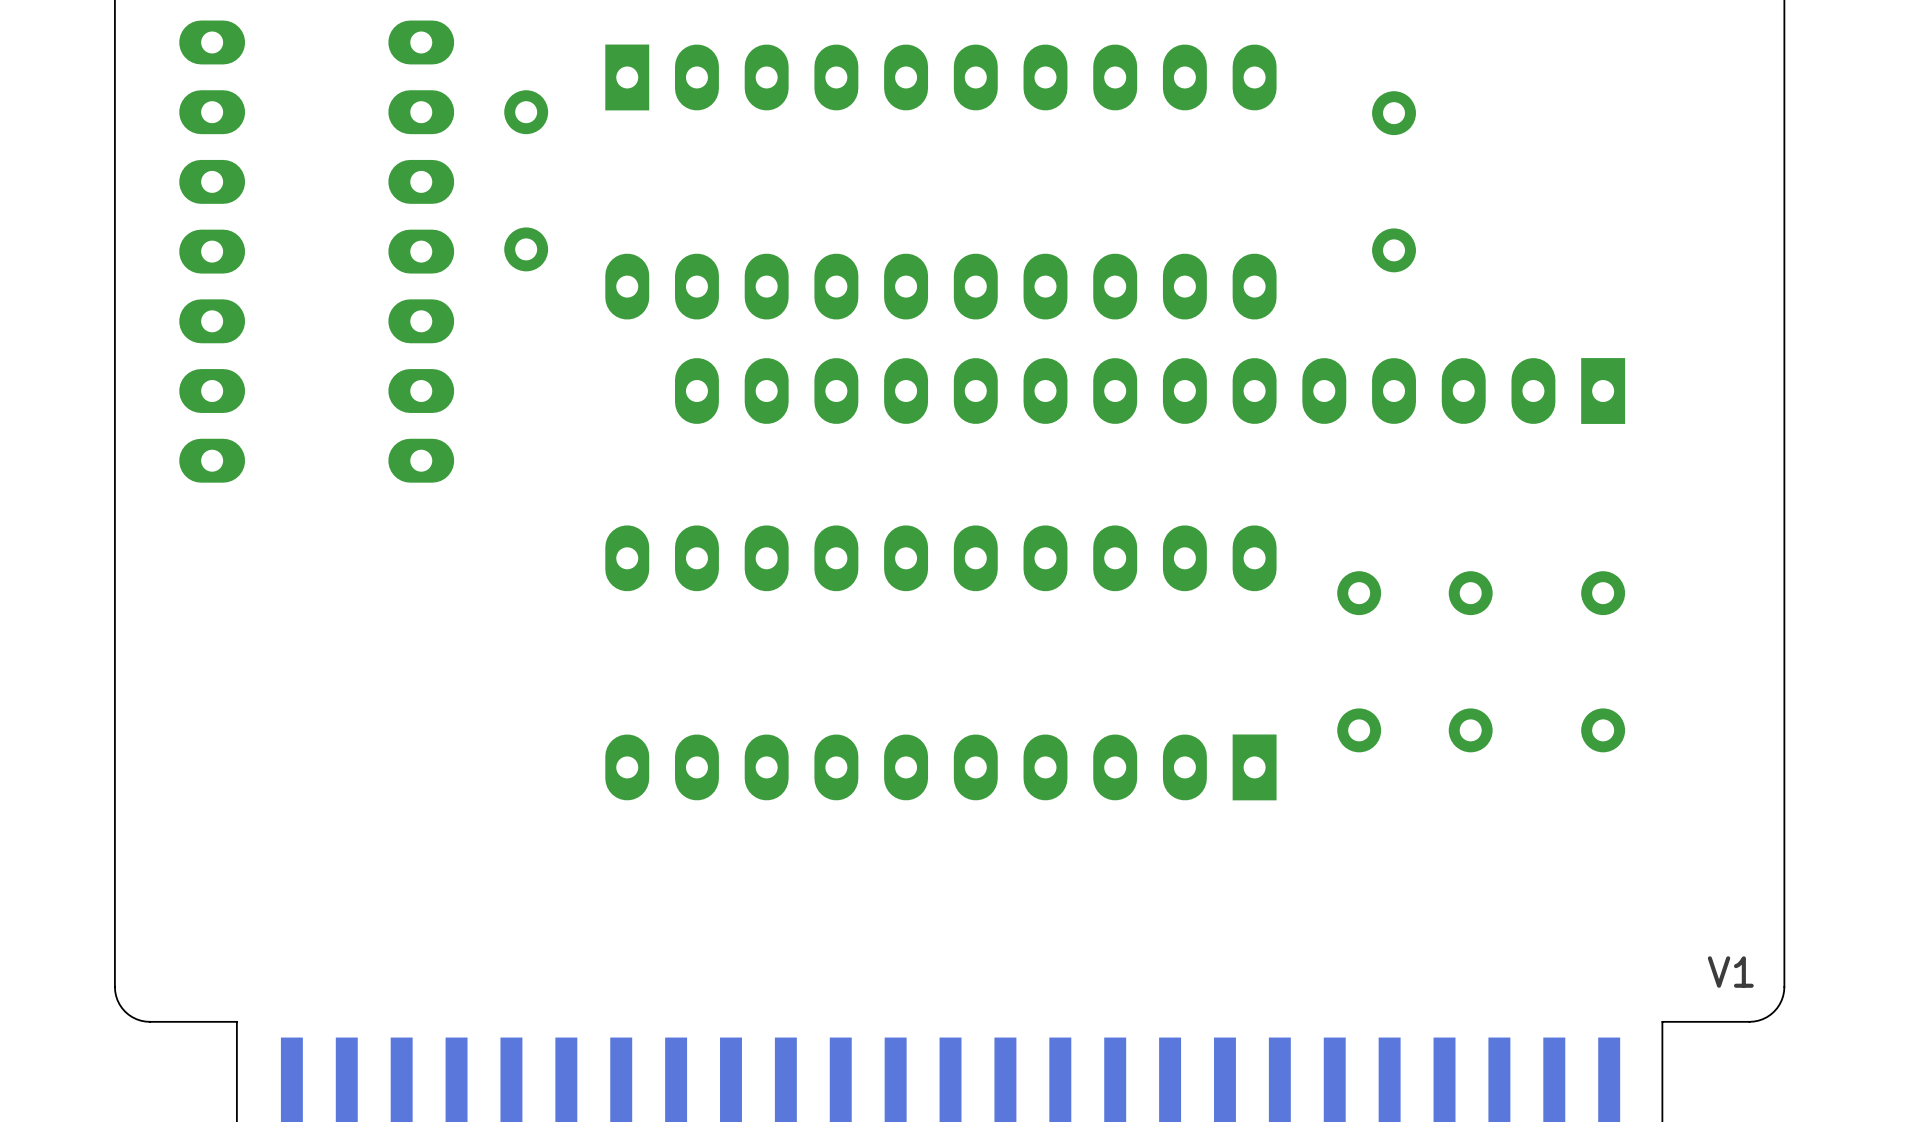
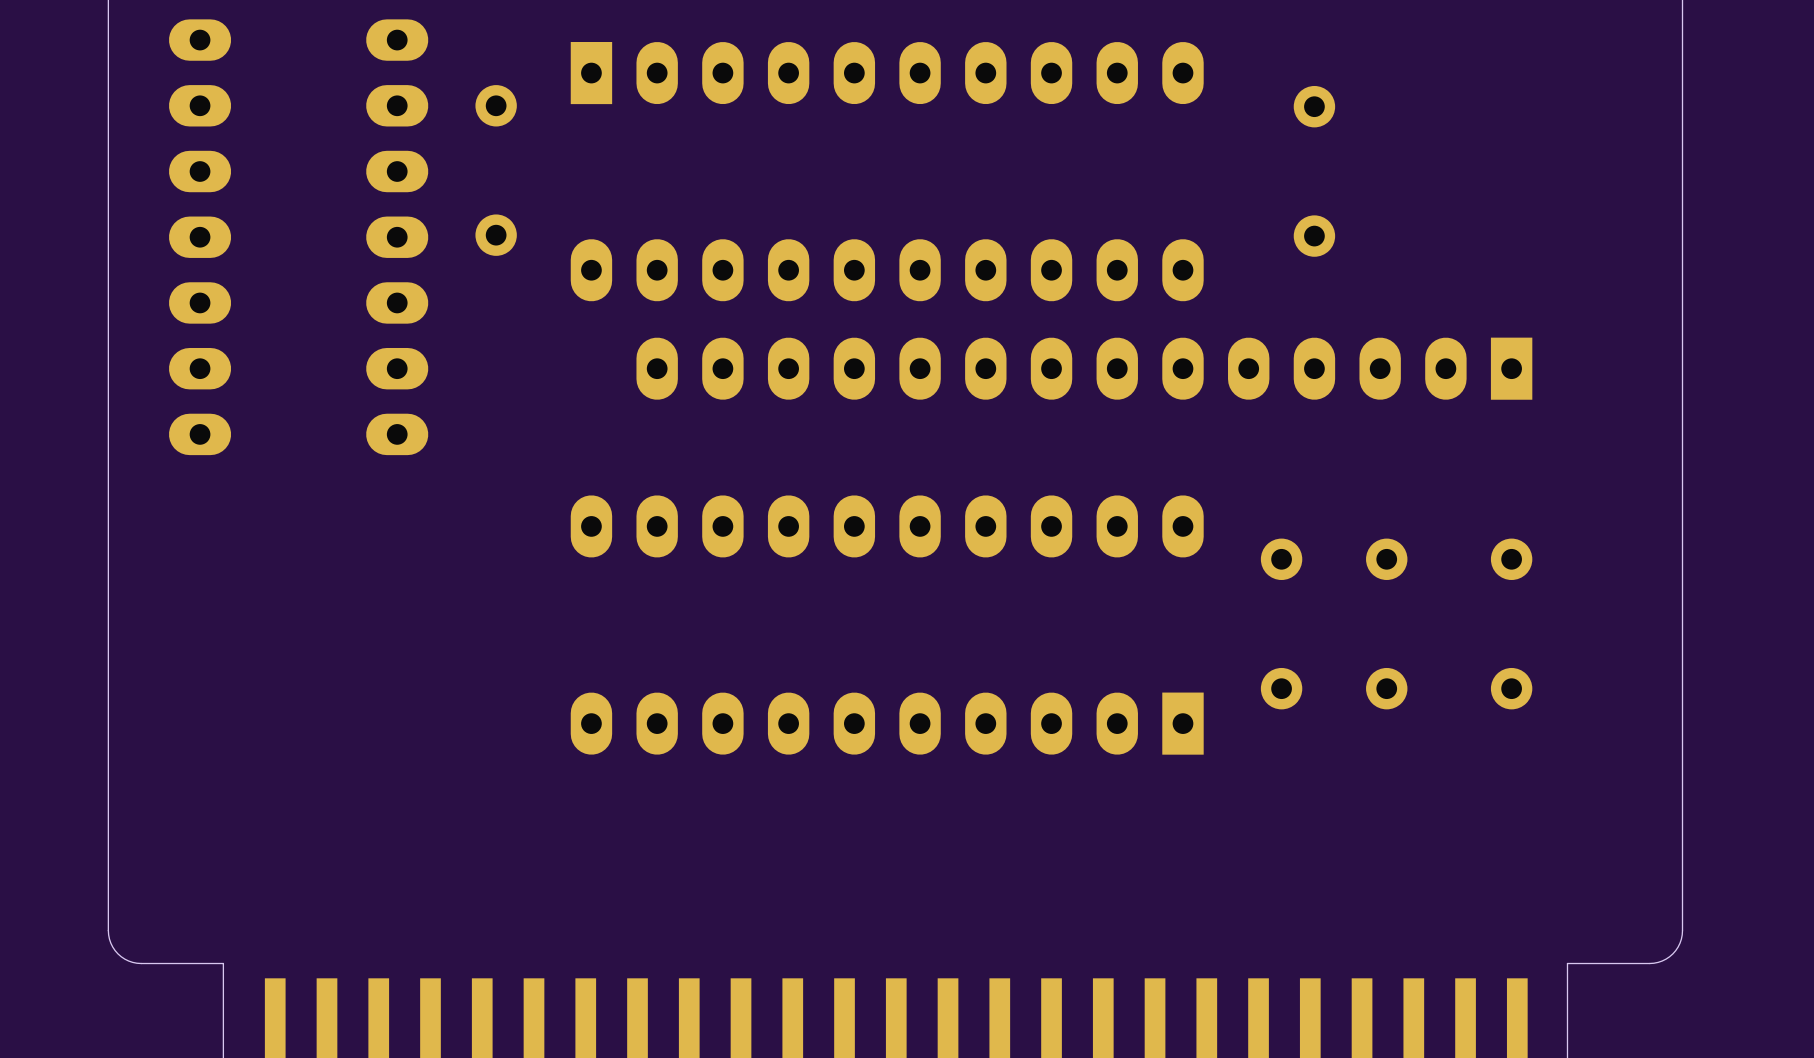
text: V1 (1730, 972) -> none

